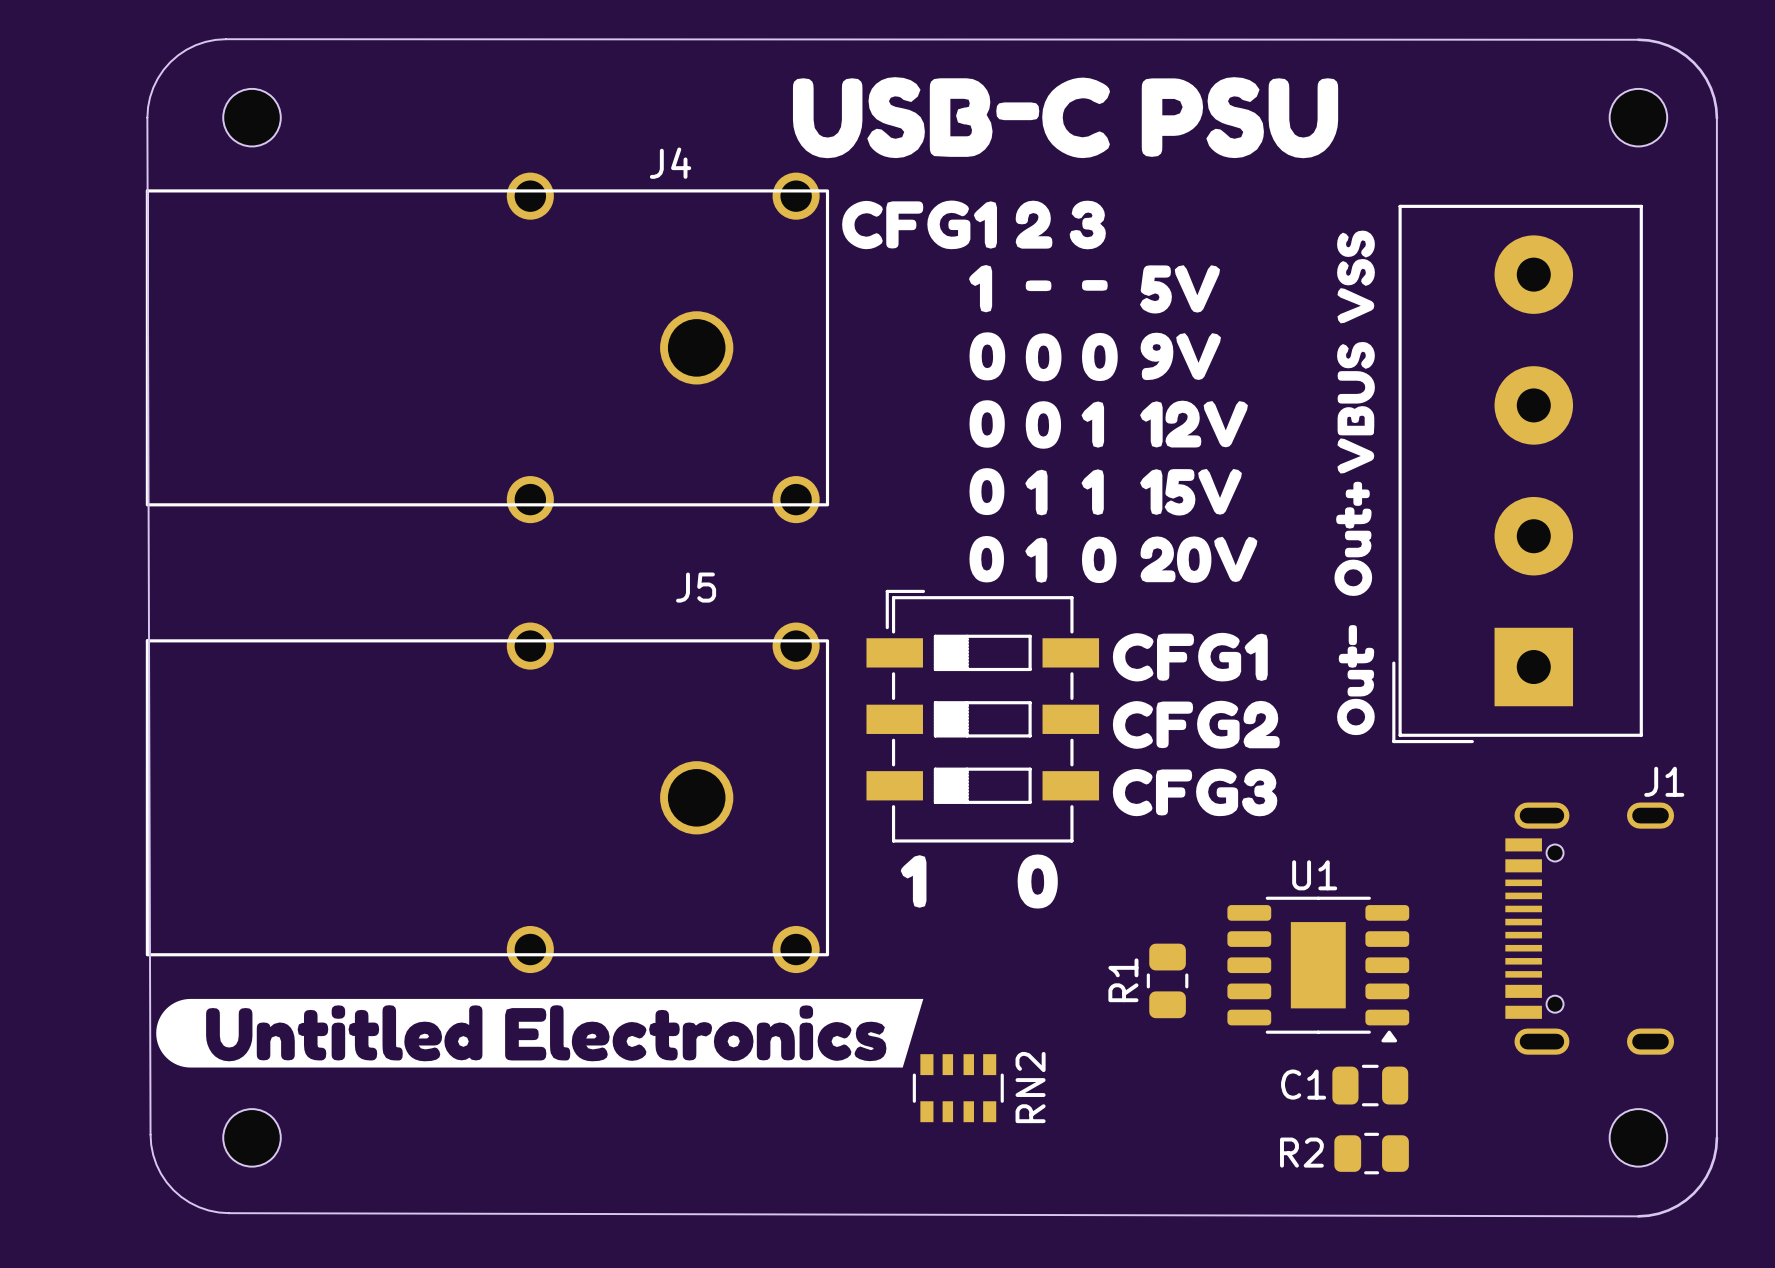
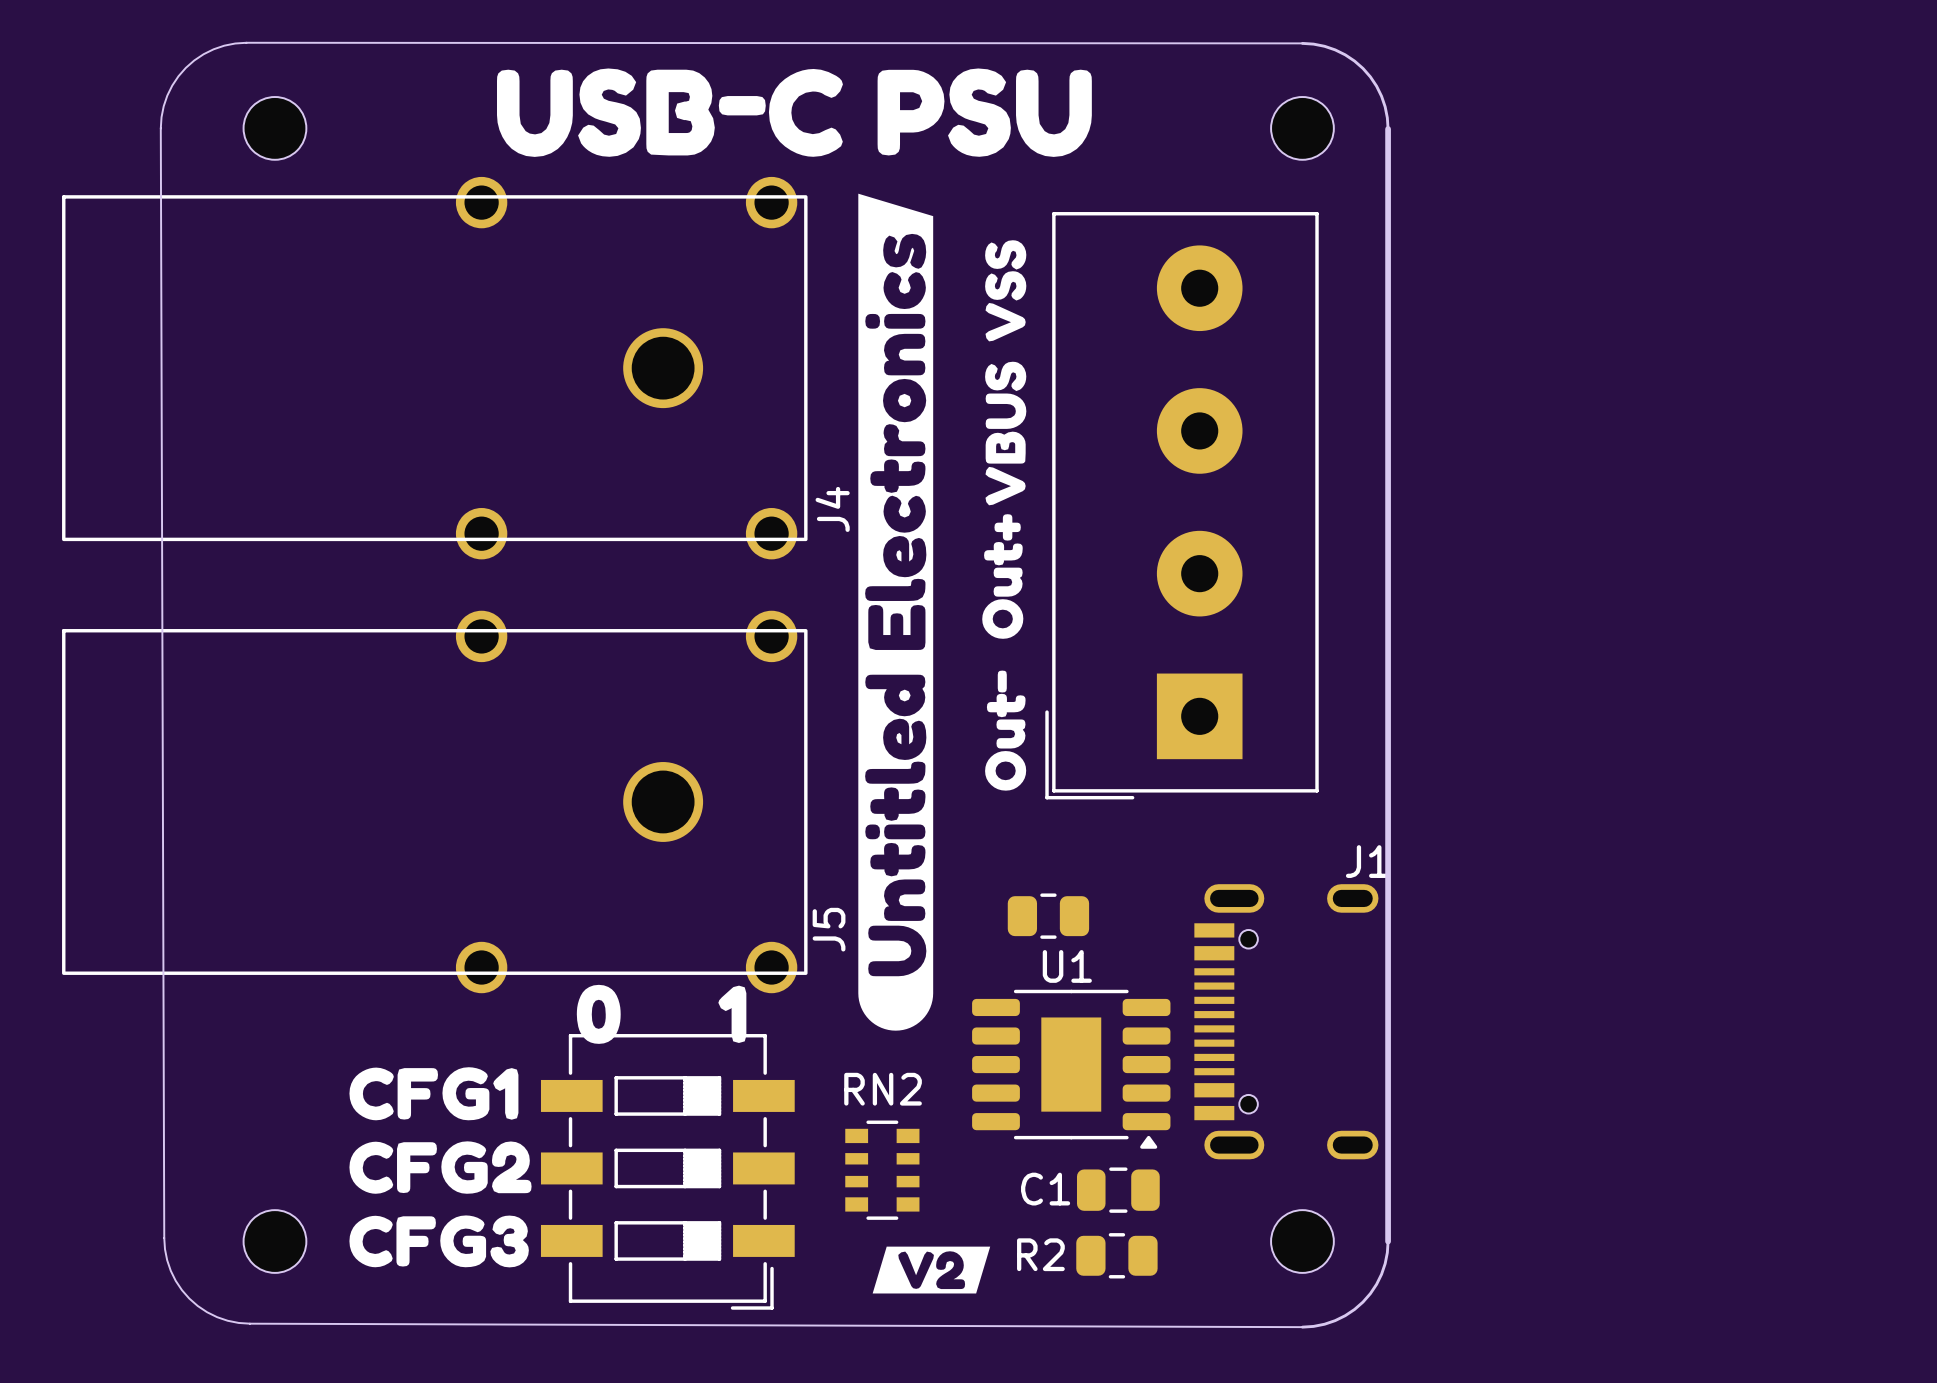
board edge: (225, 39) (1638, 39) (1668, 45) (1693, 62) (1710, 88) (1716, 118) (1716, 1137) (1714, 1158) (1706, 1177) (1686, 1200) (1658, 1213) (1638, 1216) (229, 1213) -> (246, 42) (1313, 44) (1335, 49) (1363, 68) (1381, 96) (1388, 129) (1388, 1241) (1381, 1274) (1363, 1302) (1335, 1320) (1302, 1327) (249, 1323)
drawing position: (1065, 117) -> (794, 112)
part position: (1638, 117) -> (1302, 128)
J4 name rotation: 0° (670, 163) -> 90° counterclockwise (832, 509)
J4 name position: J4 (670, 163) -> J4 (832, 509)
drawing: none -> [858, 193, 934, 1031]
drawing: [842, 200, 1258, 584] -> none
drawing position: (1355, 276) -> (1005, 290)
J4 position: (487, 347) -> (434, 368)
drawing position: (1355, 407) -> (1005, 433)
part position: (1517, 473) -> (1182, 505)
drawing position: (1353, 538) -> (1002, 576)
J5 name rotation: 0° (696, 587) -> 90° counterclockwise (829, 929)
J5 name position: J5 (696, 587) -> J5 (829, 929)
drawing: [1112, 632, 1280, 817] -> none
drawing position: (1355, 680) -> (1005, 730)
part rotation: 0° (982, 716) -> 180° (667, 1171)
part position: (982, 716) -> (667, 1171)
J5 position: (487, 797) -> (434, 801)
part: none -> (1048, 916)
drawing: [900, 854, 1058, 909] -> none
drawing: none -> [576, 984, 747, 1044]
J1 position: (1589, 928) -> (1286, 1021)
U1 position: (1318, 969) -> (1071, 1069)
drawing: none -> [349, 1067, 532, 1268]
R1: (1167, 980) -> none
drawing: [156, 998, 924, 1068] -> none
C1 position: (1370, 1085) -> (1118, 1190)
RN2 name position: RN2 (1030, 1087) -> RN2 (883, 1089)
RN2 rotation: 0° (958, 1088) -> 90° clockwise (882, 1170)
RN2 position: (958, 1088) -> (882, 1170)
part position: (1638, 1137) -> (1302, 1241)
drawing: none -> [872, 1246, 991, 1294]
R2 position: (1371, 1153) -> (1116, 1255)

